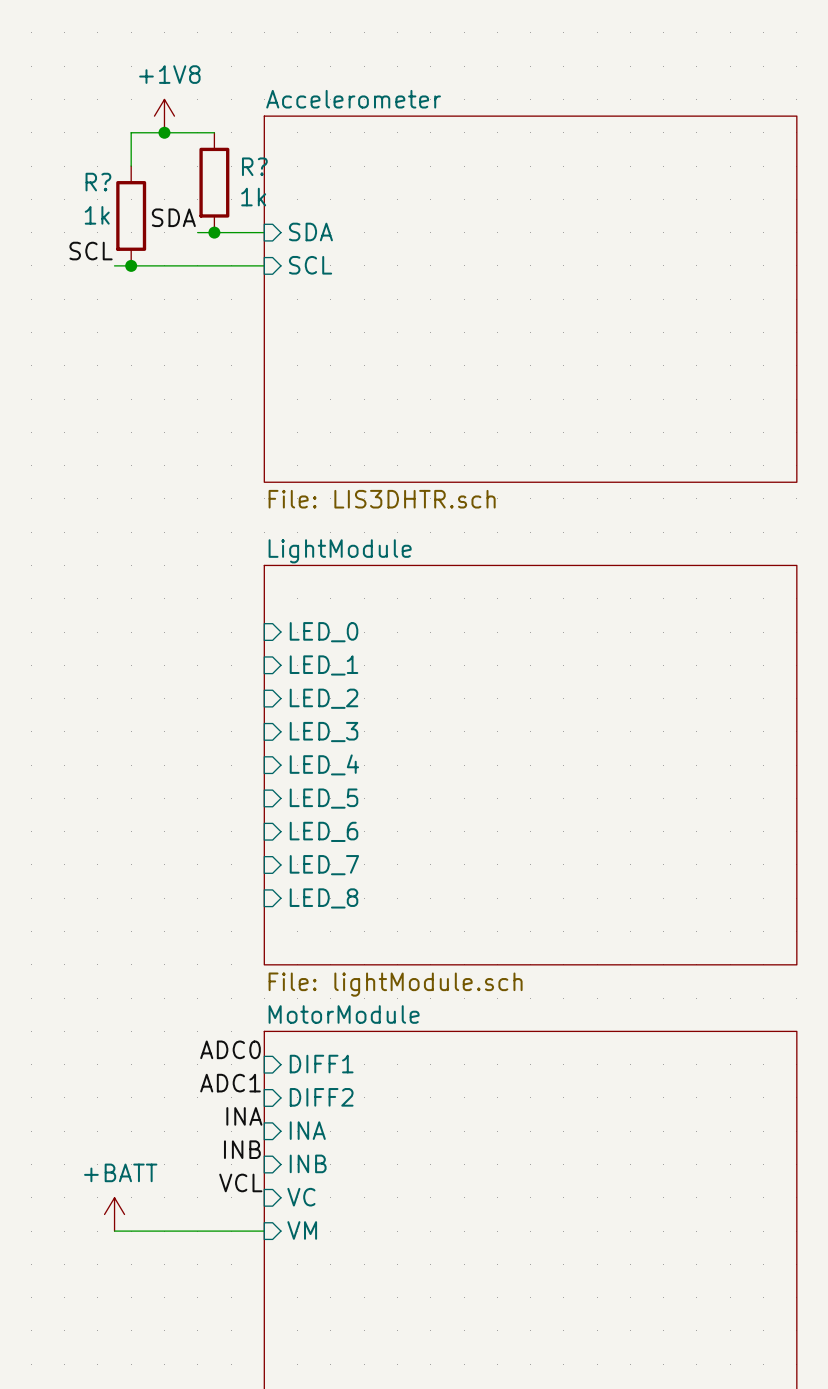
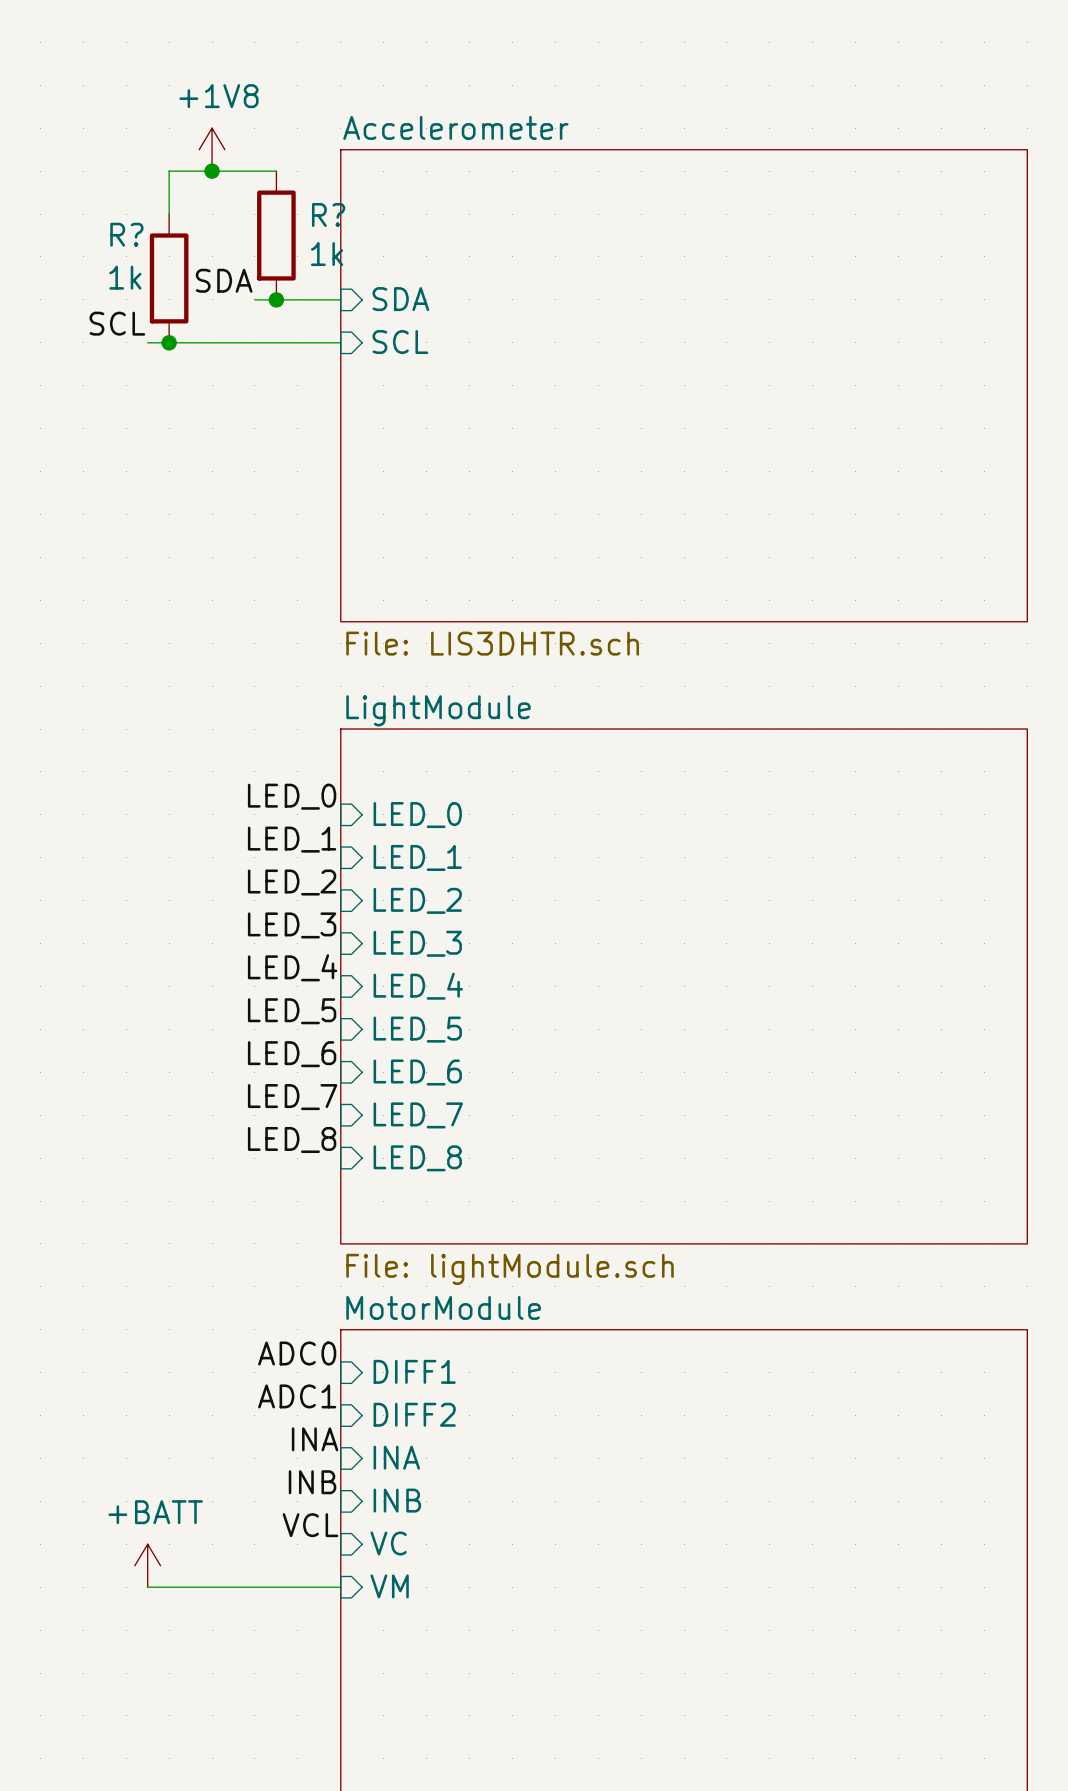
label: none -> LED_0 (292, 796)
label: none -> LED_1 (292, 839)
label: none -> LED_2 (292, 882)
label: none -> LED_3 (292, 925)
label: none -> LED_4 (292, 967)
label: none -> LED_5 (292, 1011)
label: none -> LED_6 (292, 1054)
label: none -> LED_7 (292, 1097)
label: none -> LED_8 (292, 1139)

